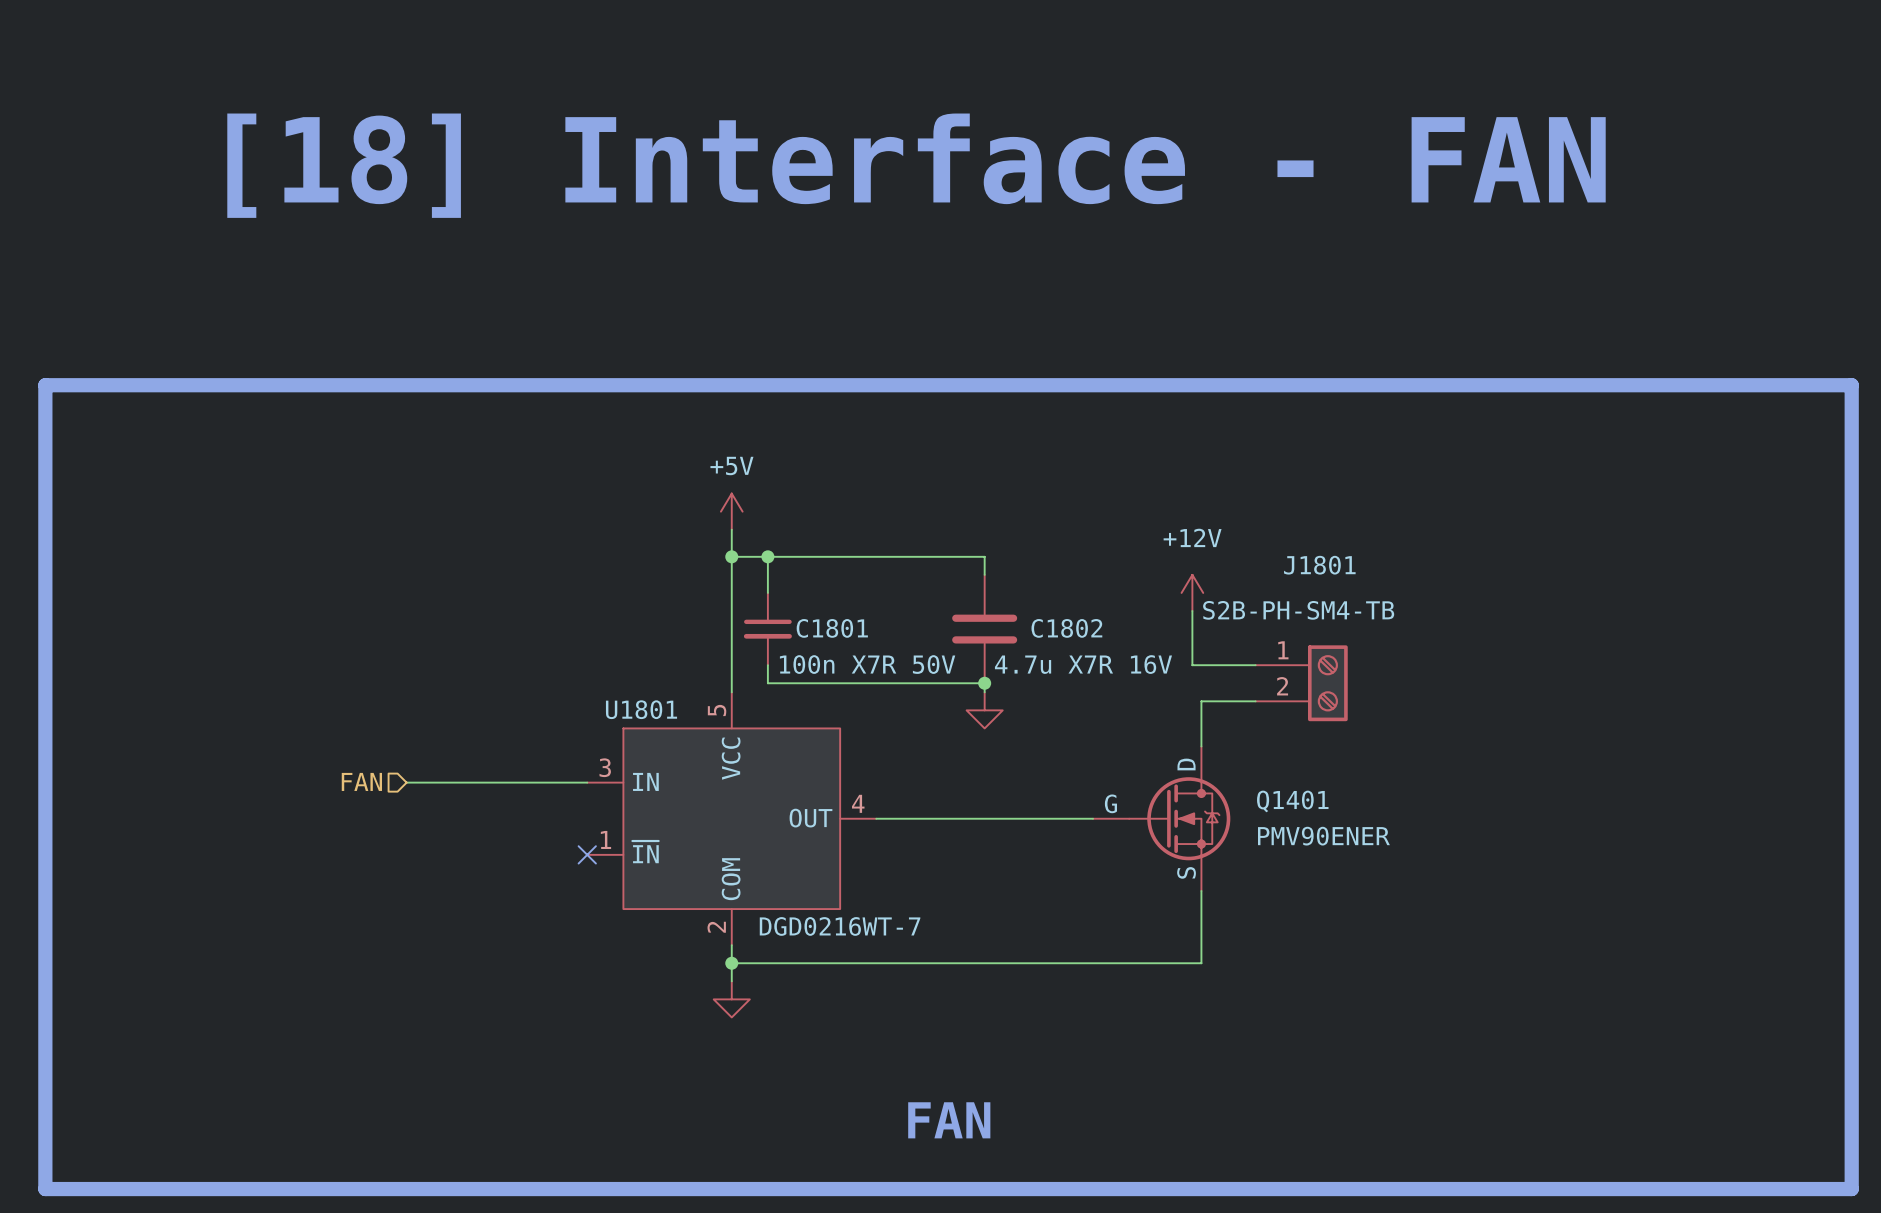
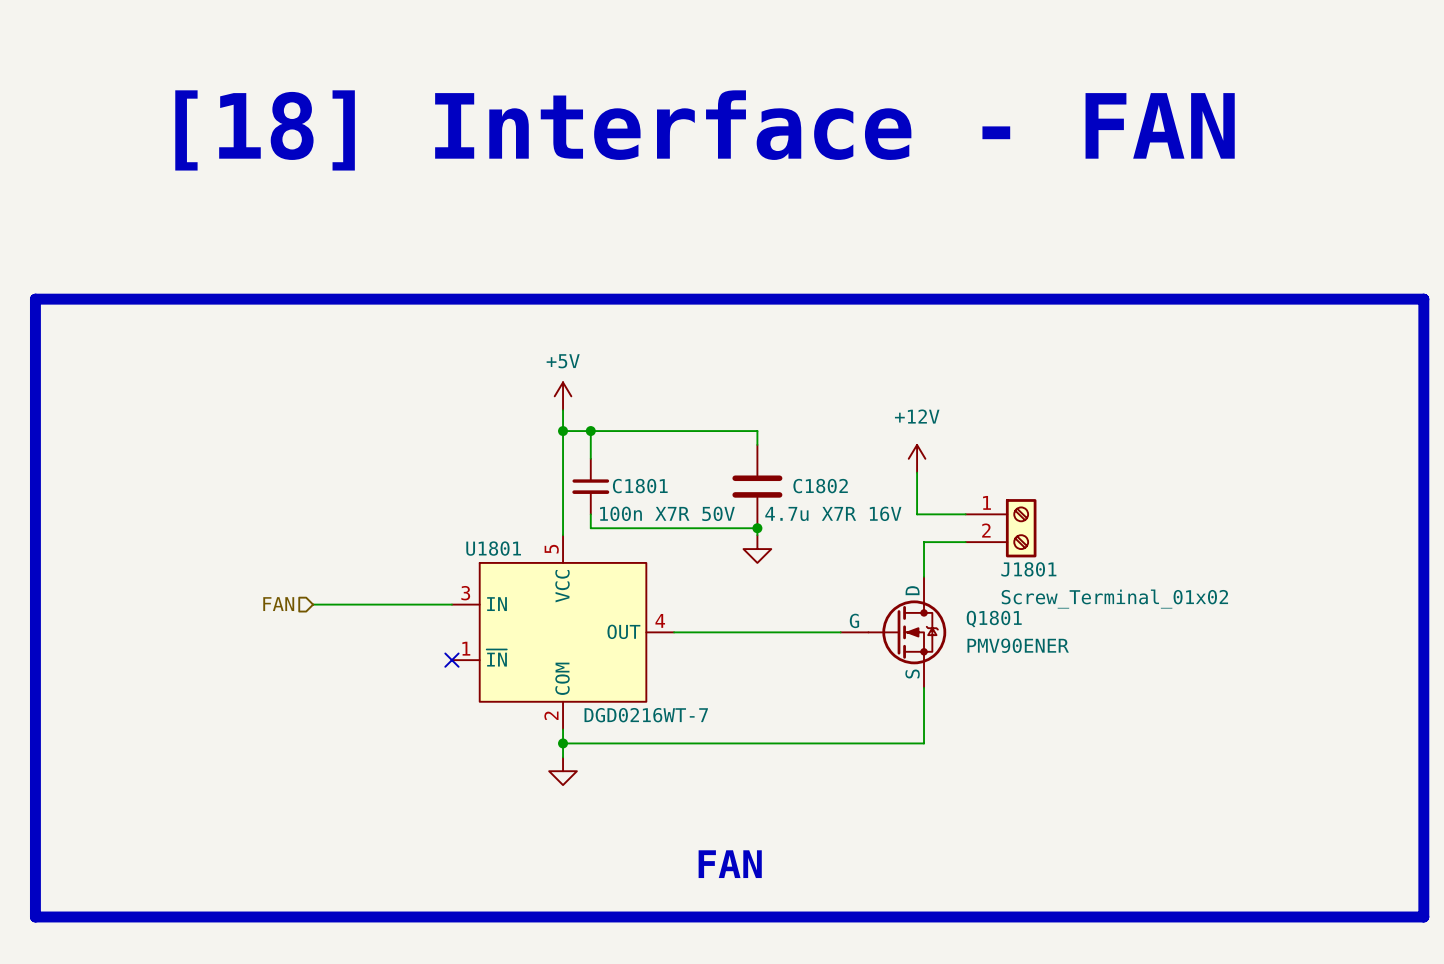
J1801 name position: J1801 (1319, 565) -> J1801 (1028, 569)
J1801 value: S2B-PH-SM4-TB (1298, 610) -> Screw_Terminal_01x02 (1114, 599)
Q1401 name: Q1401 (1292, 801) -> Q1801 (994, 619)

